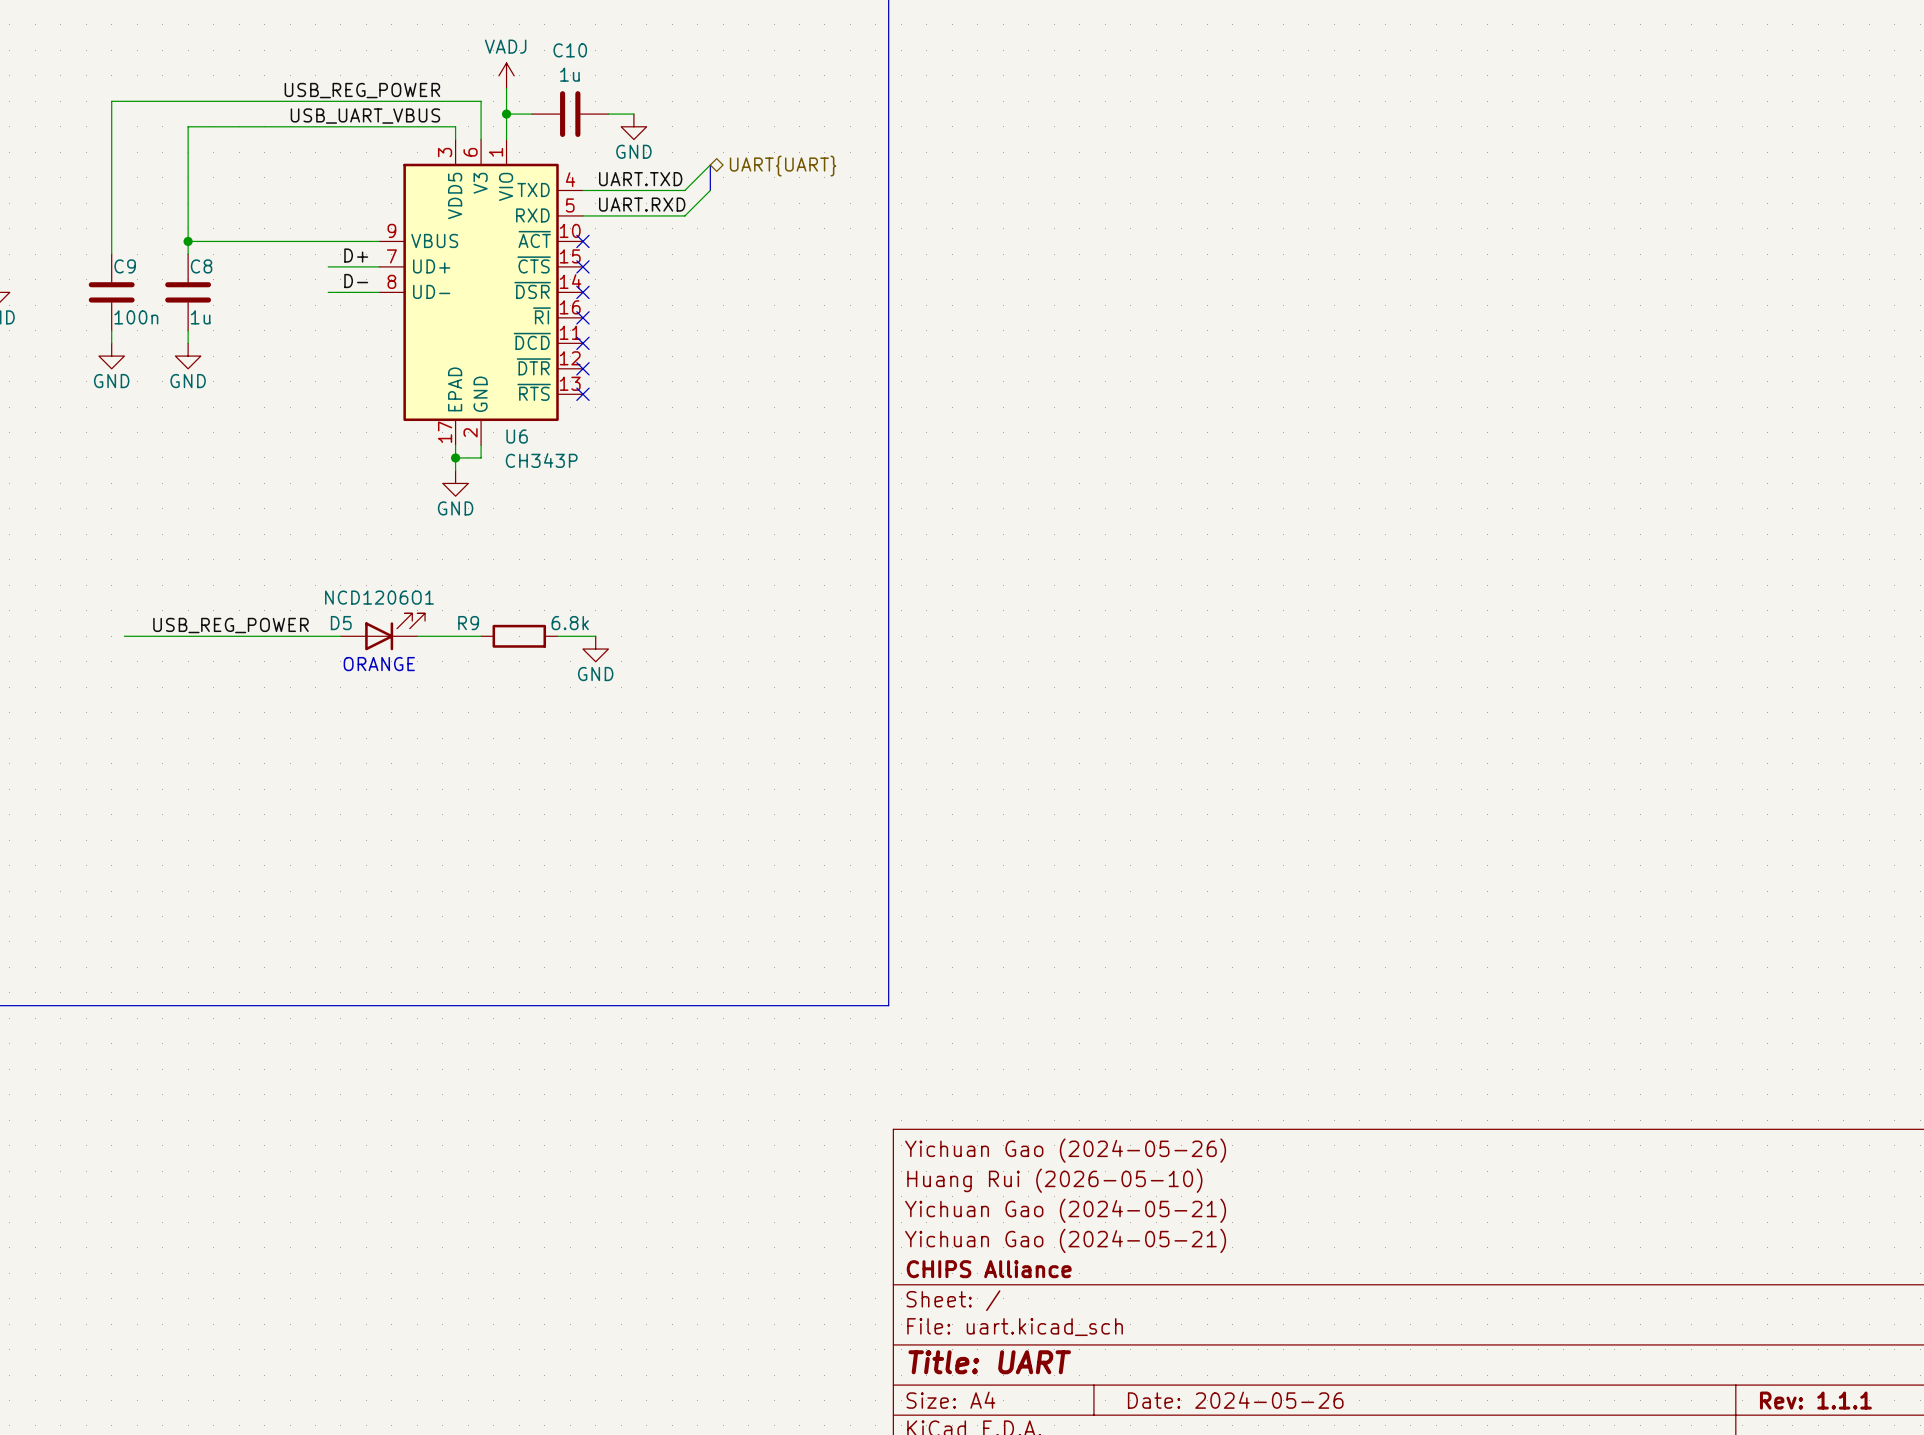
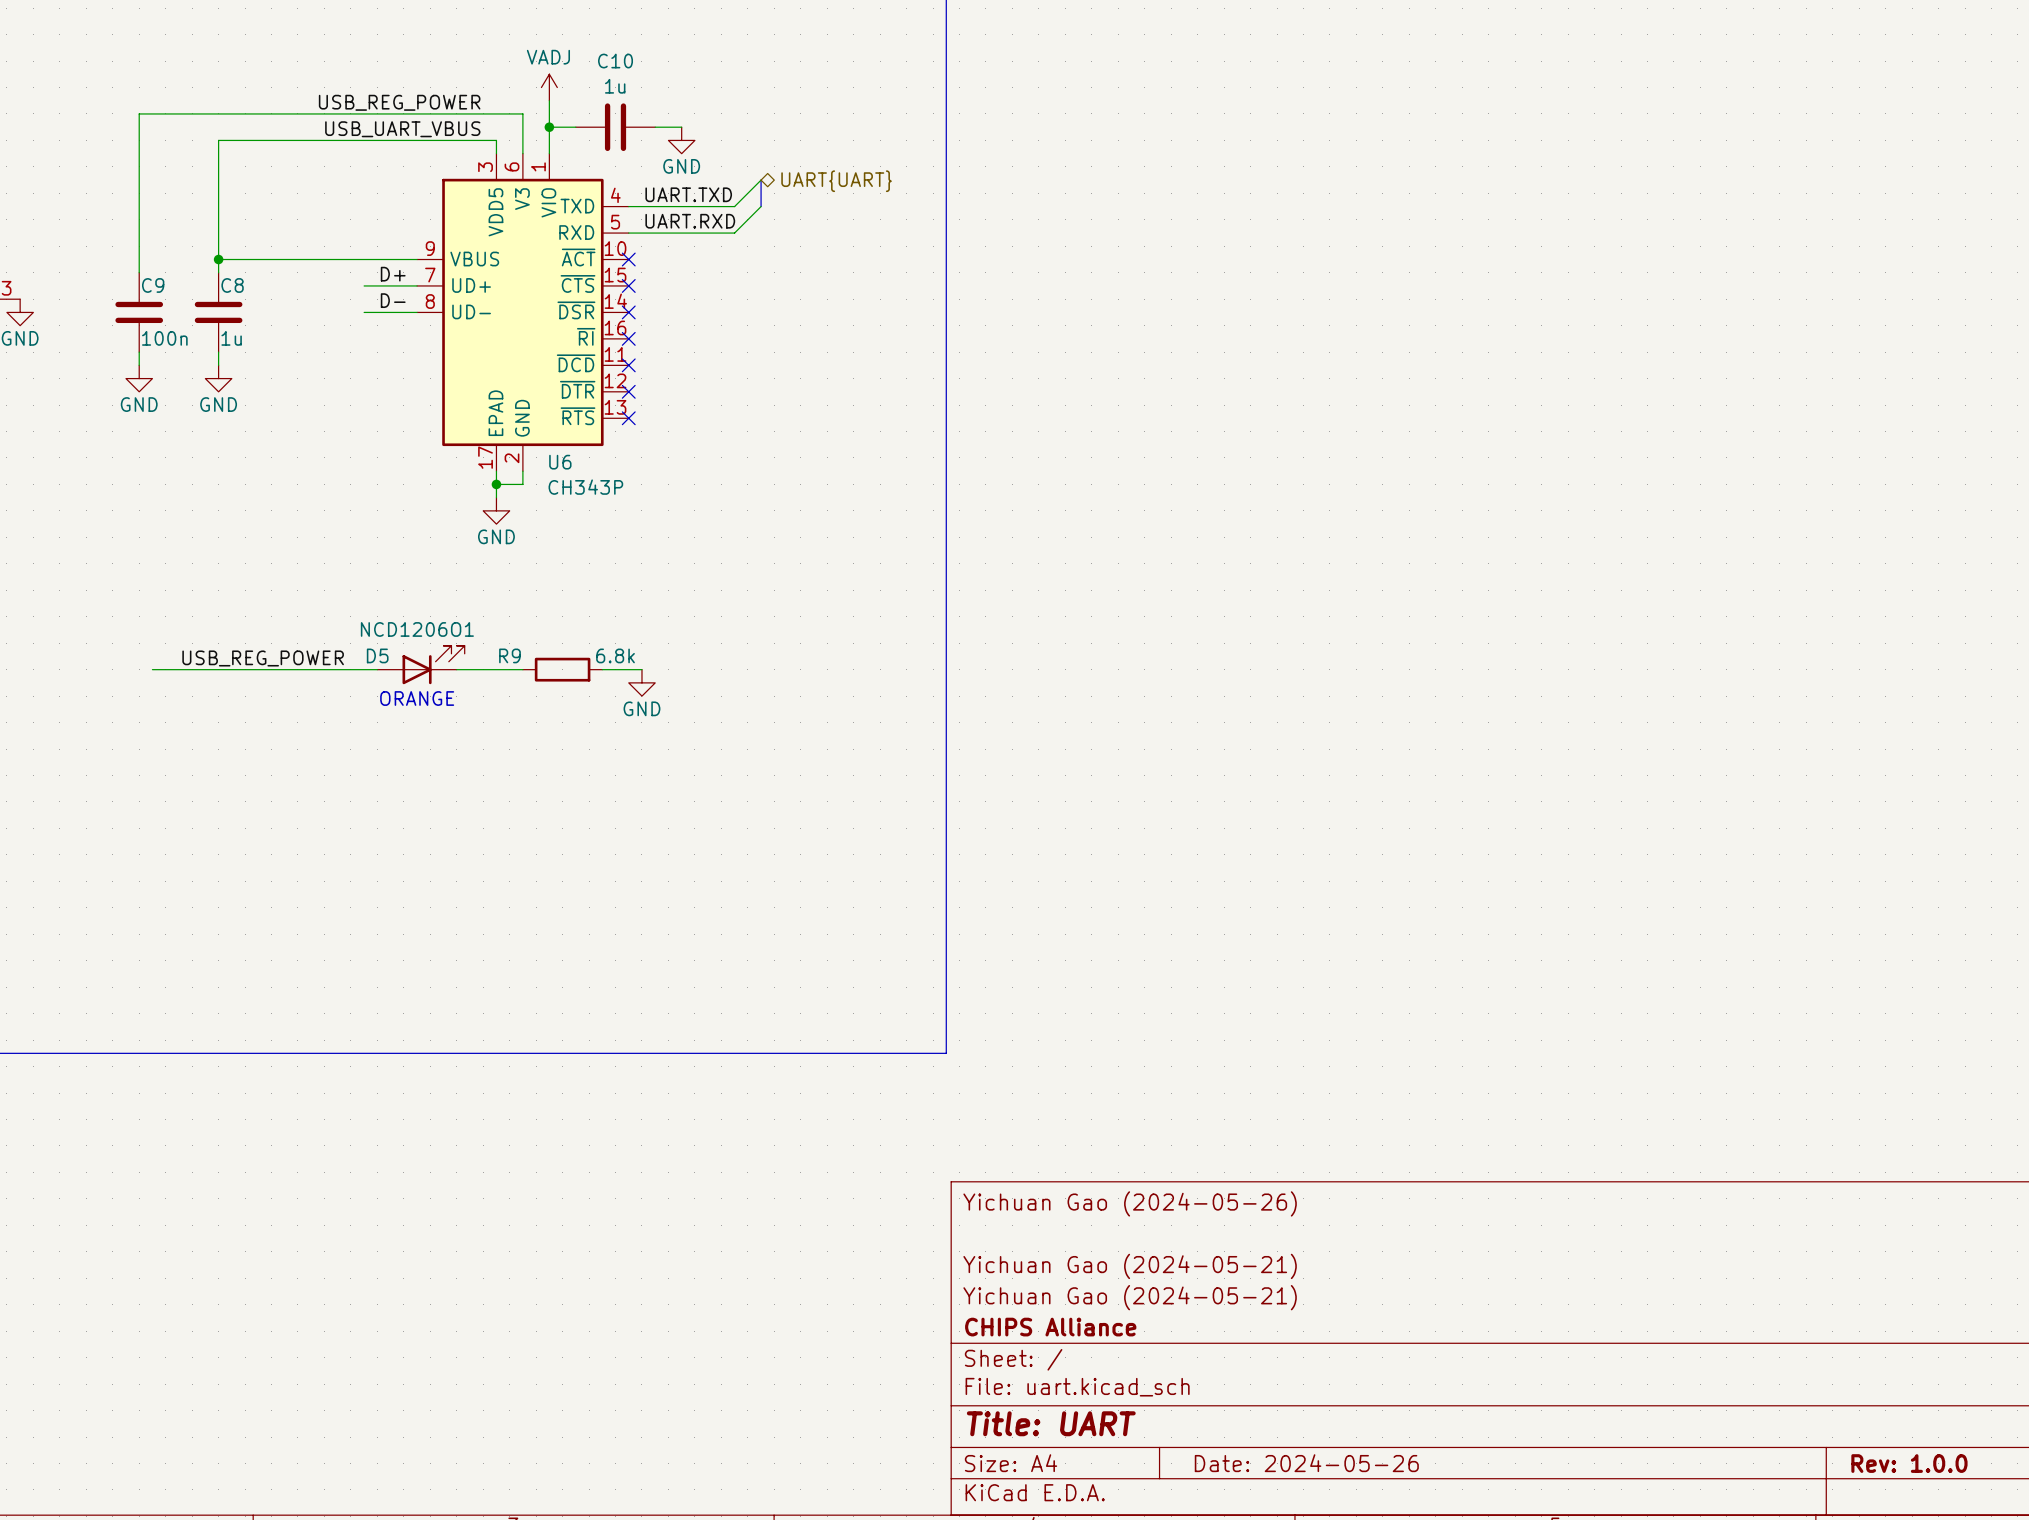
title block: Huang Rui (2026-05-10) (1054, 1180) -> none
title block: Rev: 1.1.1 (1815, 1400) -> Rev: 1.0.0 (1909, 1463)

